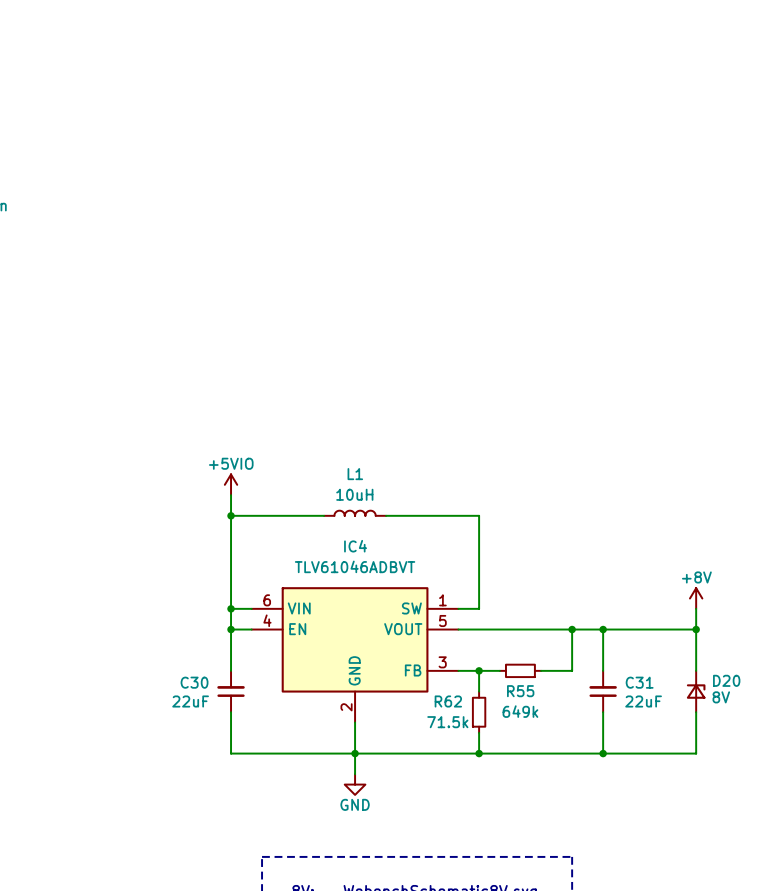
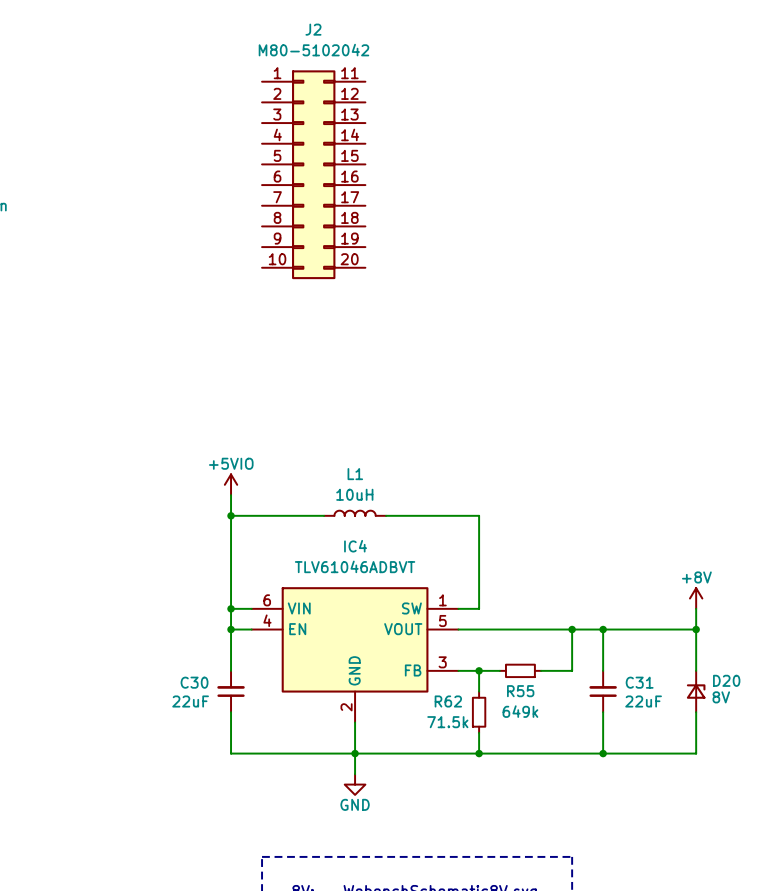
J2: none -> M80-5102042 (313, 174)

